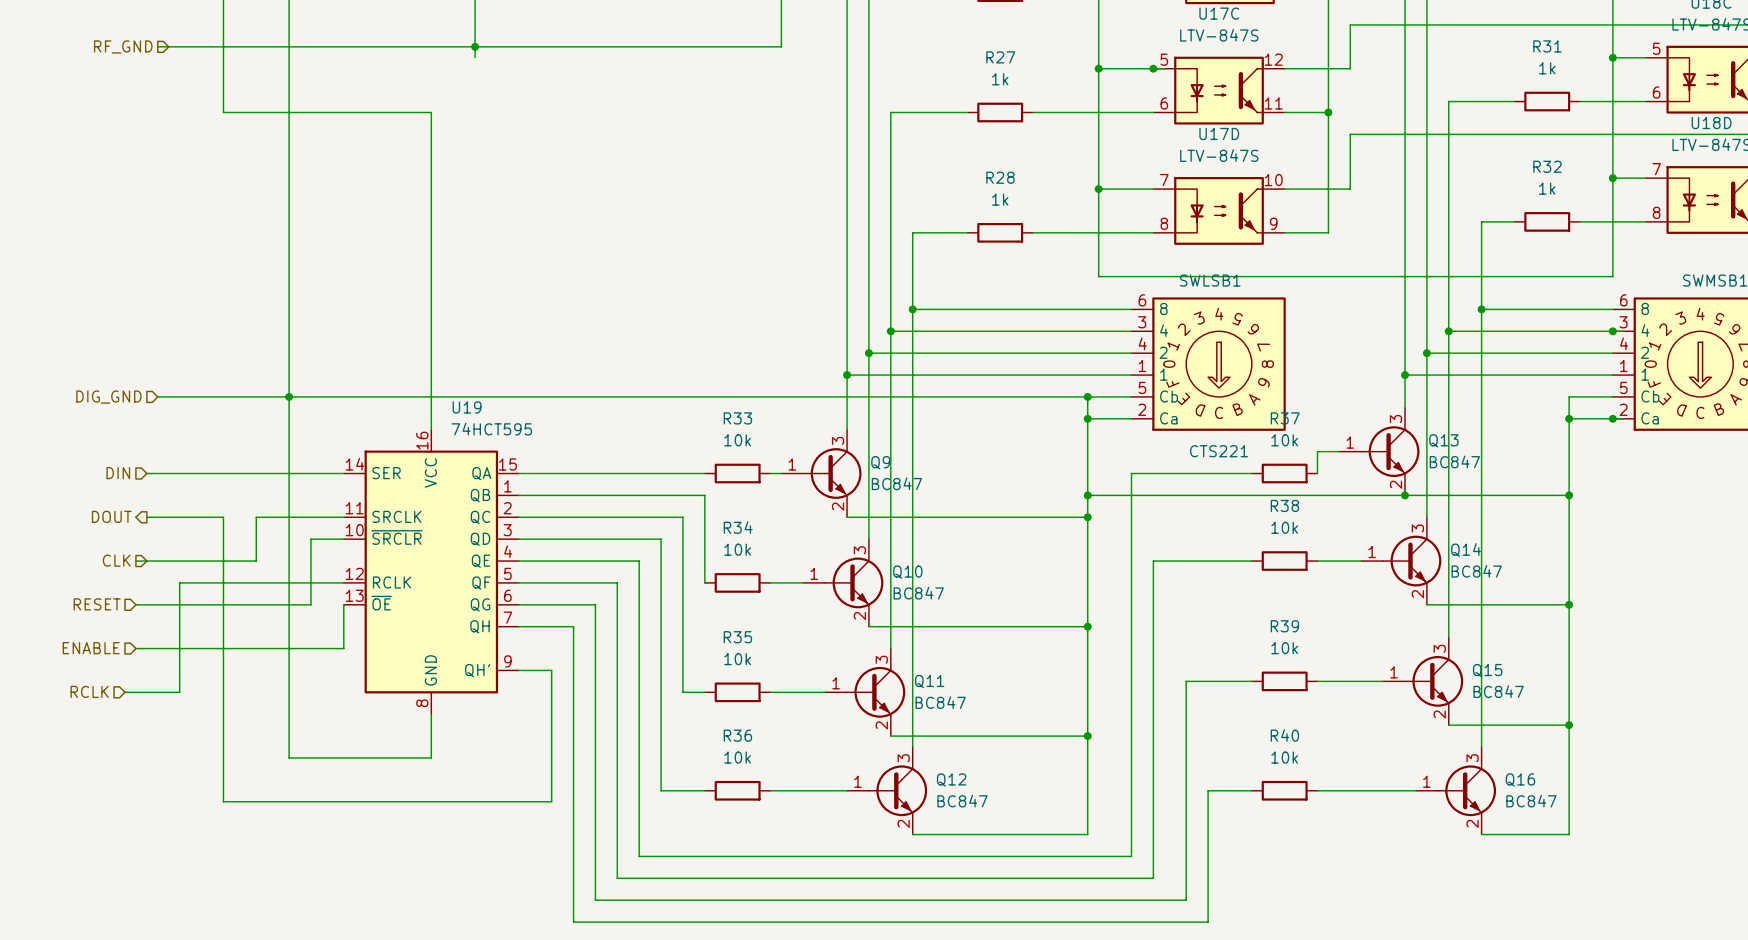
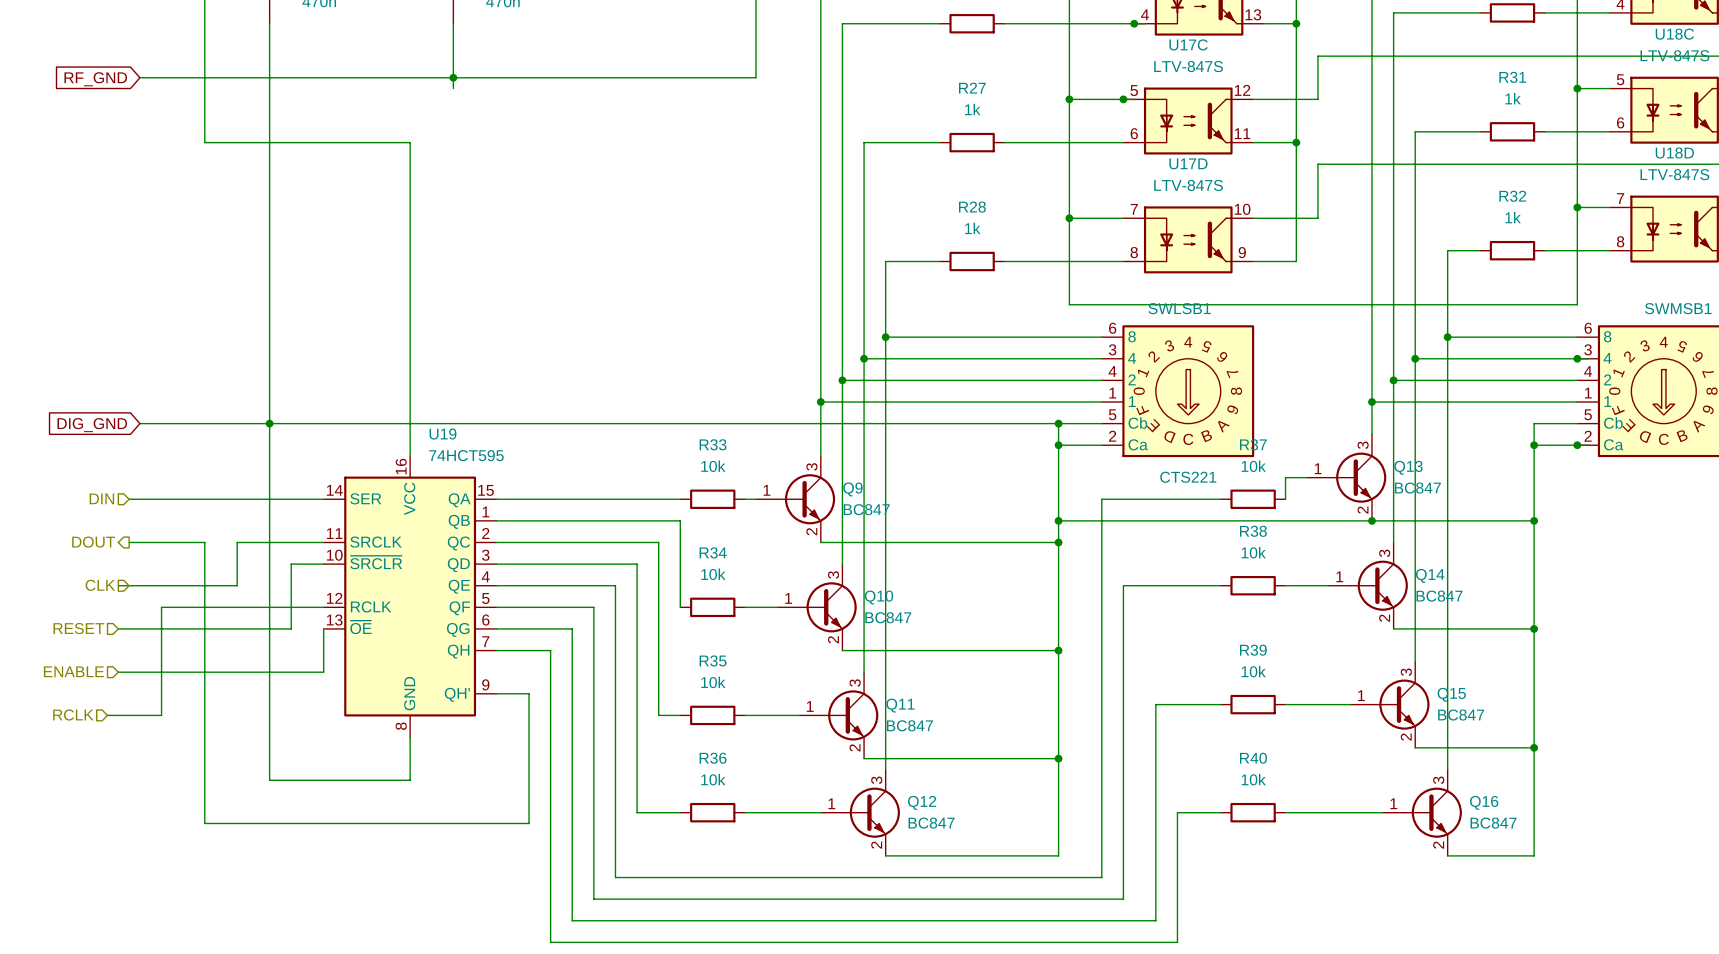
hierarchical label: RF_GND (123, 46) -> none
global label: none -> RF_GND (95, 79)
hierarchical label: DIG_GND (108, 397) -> none
global label: none -> DIG_GND (92, 425)

